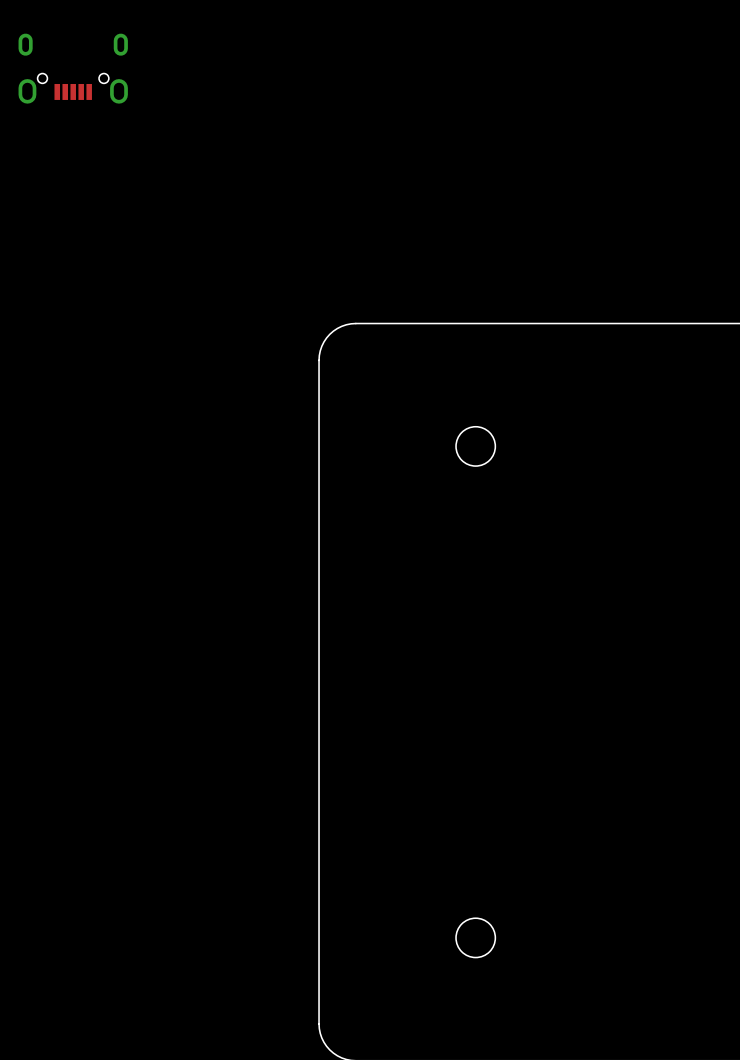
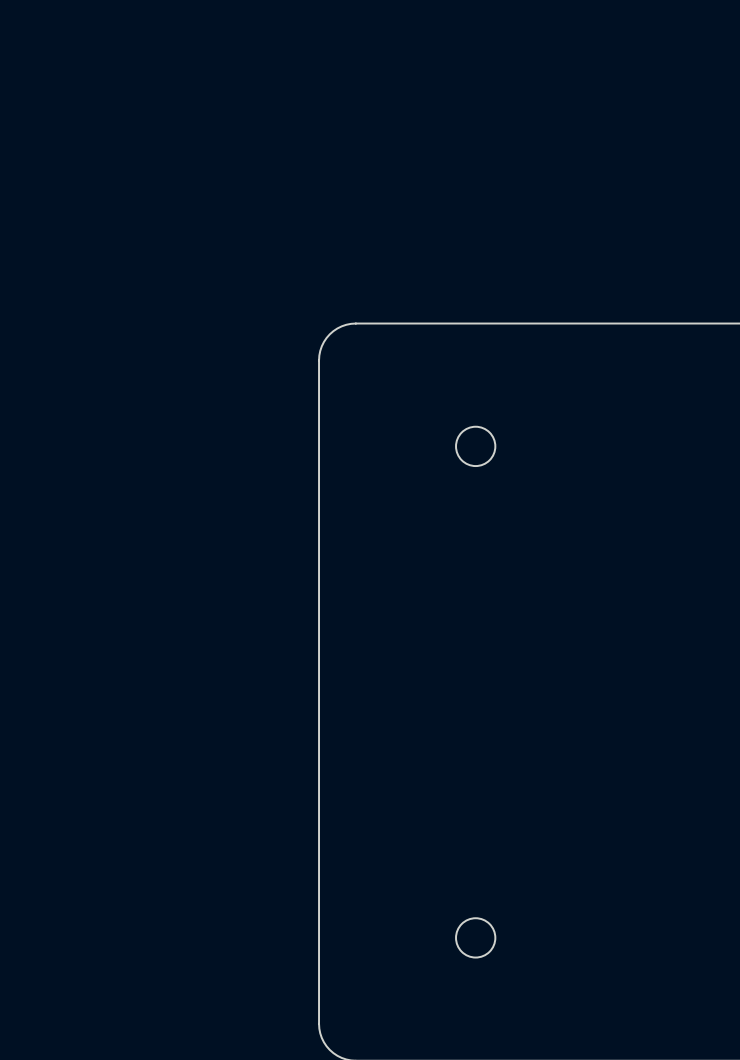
part: (73, 68) -> none

